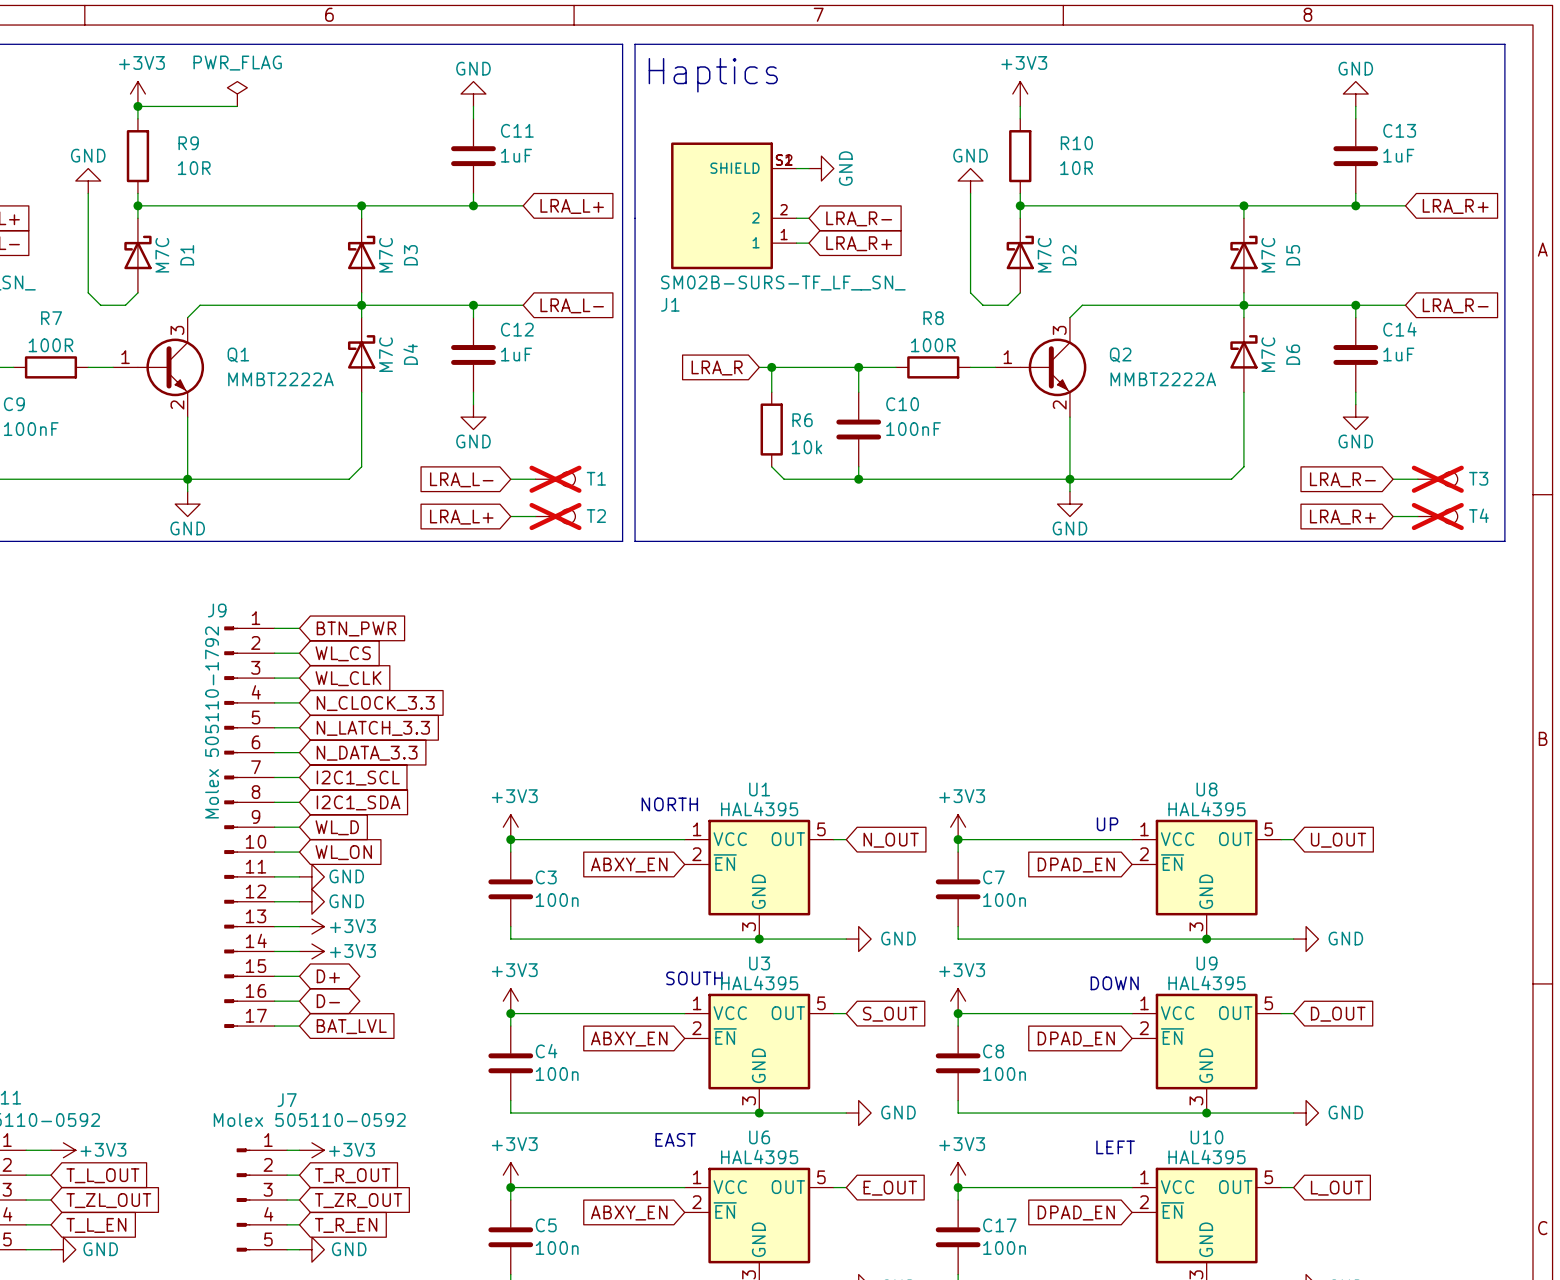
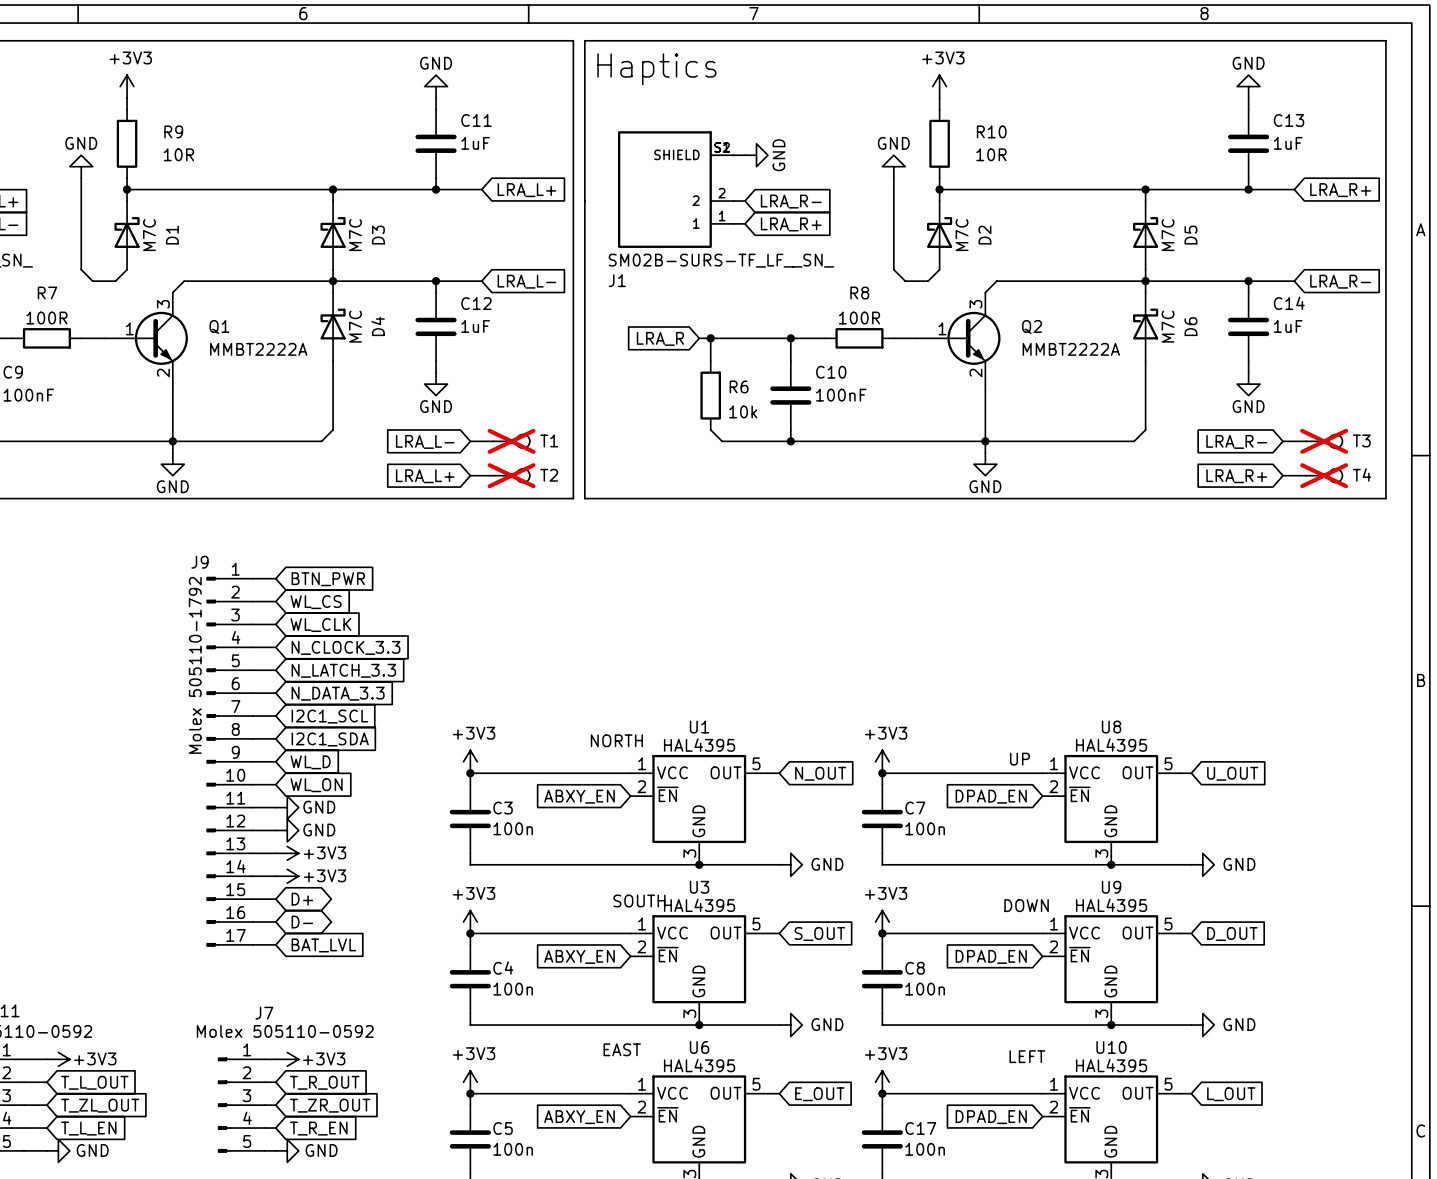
power symbol: PWR_FLAG (237, 94) -> none
wire: (137, 106) (237, 106) -> none
junction: (137, 106) -> none
Q1 symbol: [113, 317, 205, 418] -> [104, 292, 188, 385]
Q2 symbol: [995, 317, 1087, 418] -> [916, 292, 1001, 385]

